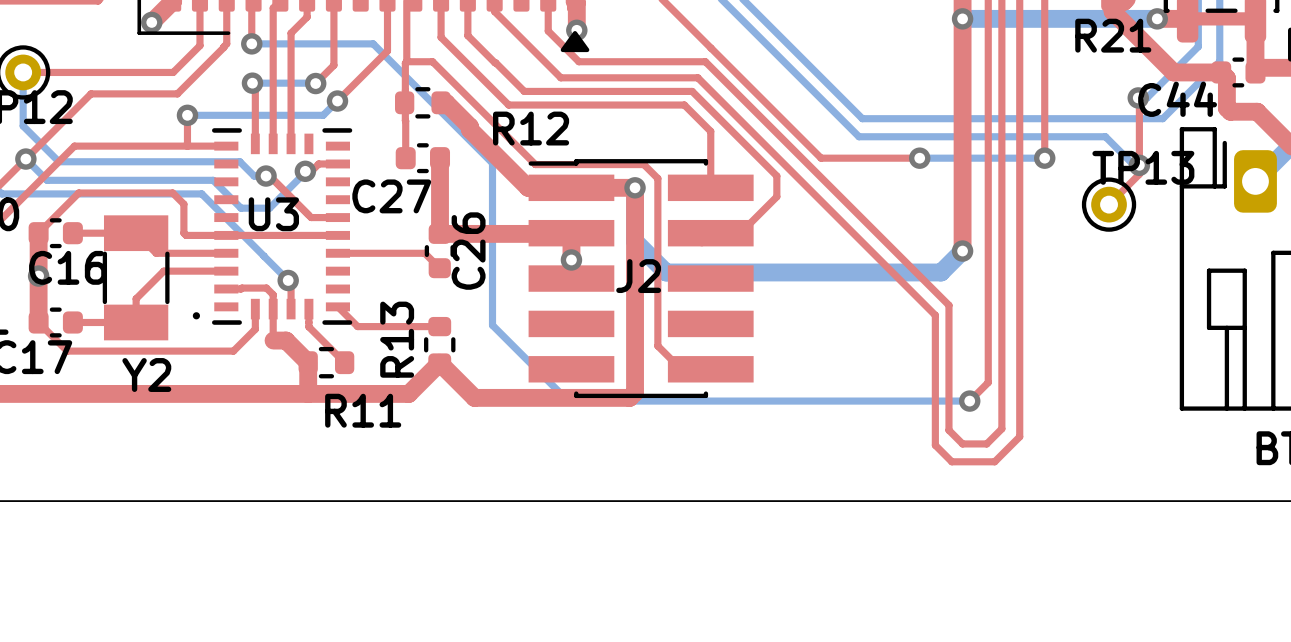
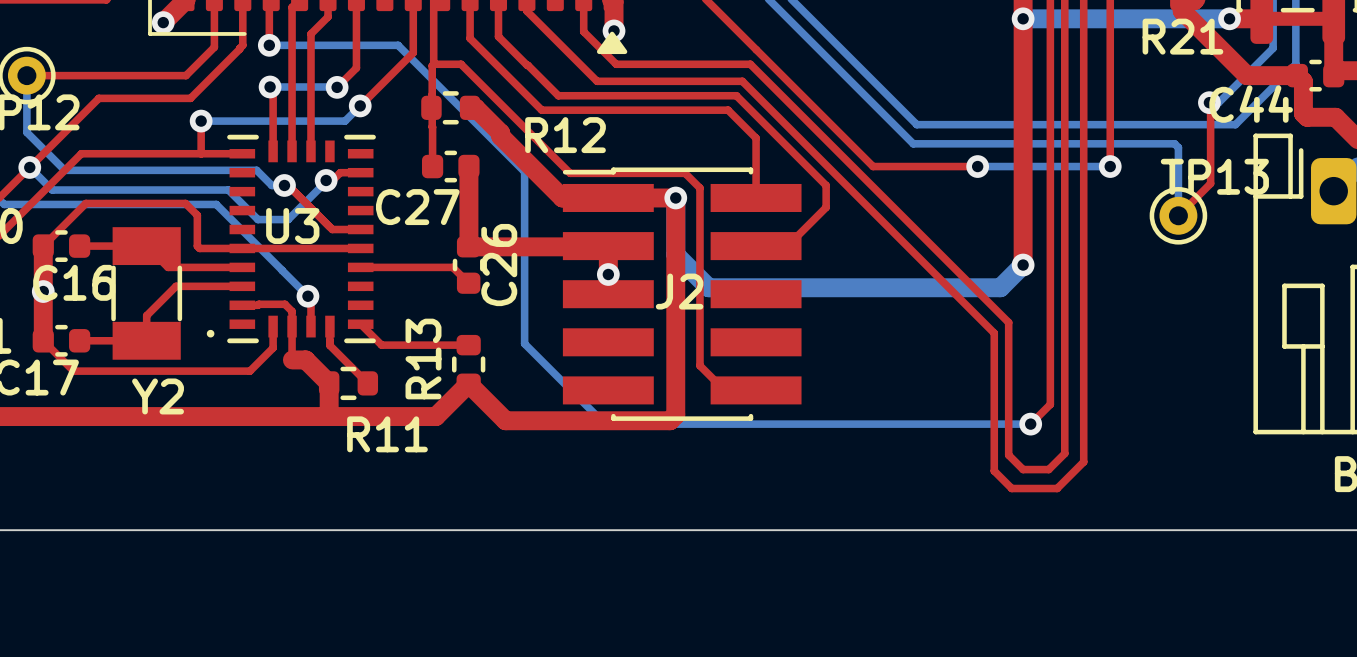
bottom track: (1109, 140) (1134, 165) (1139, 165) -> (1178, 147) (1178, 215)
via: (1139, 165) -> none

